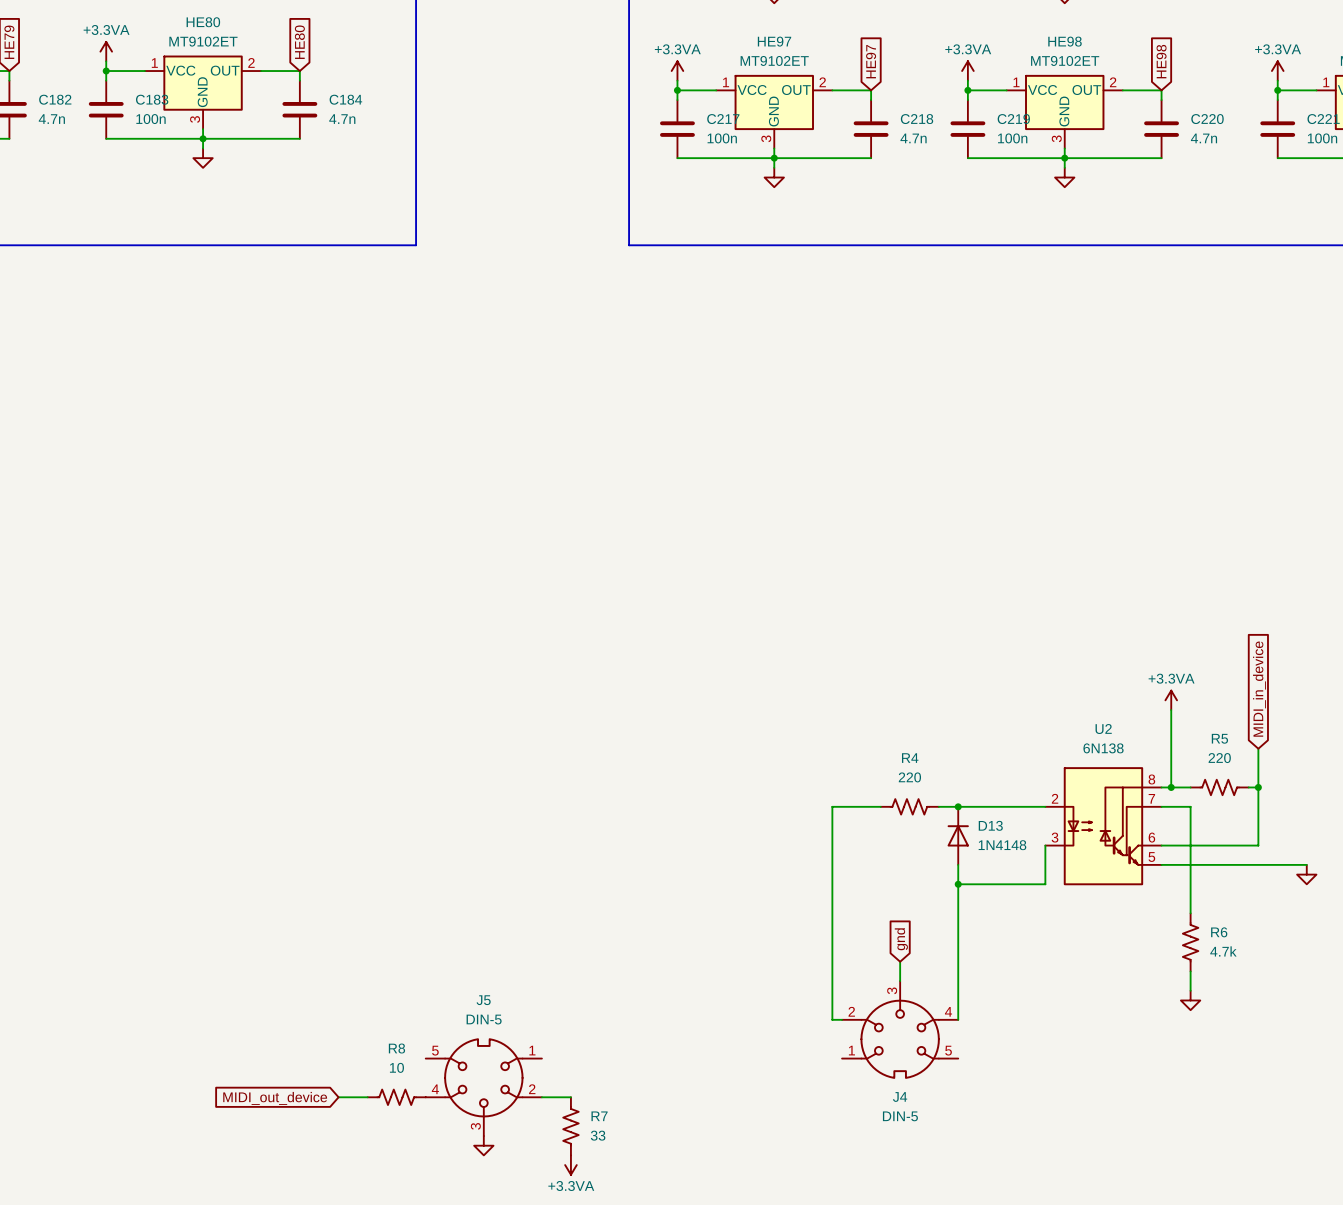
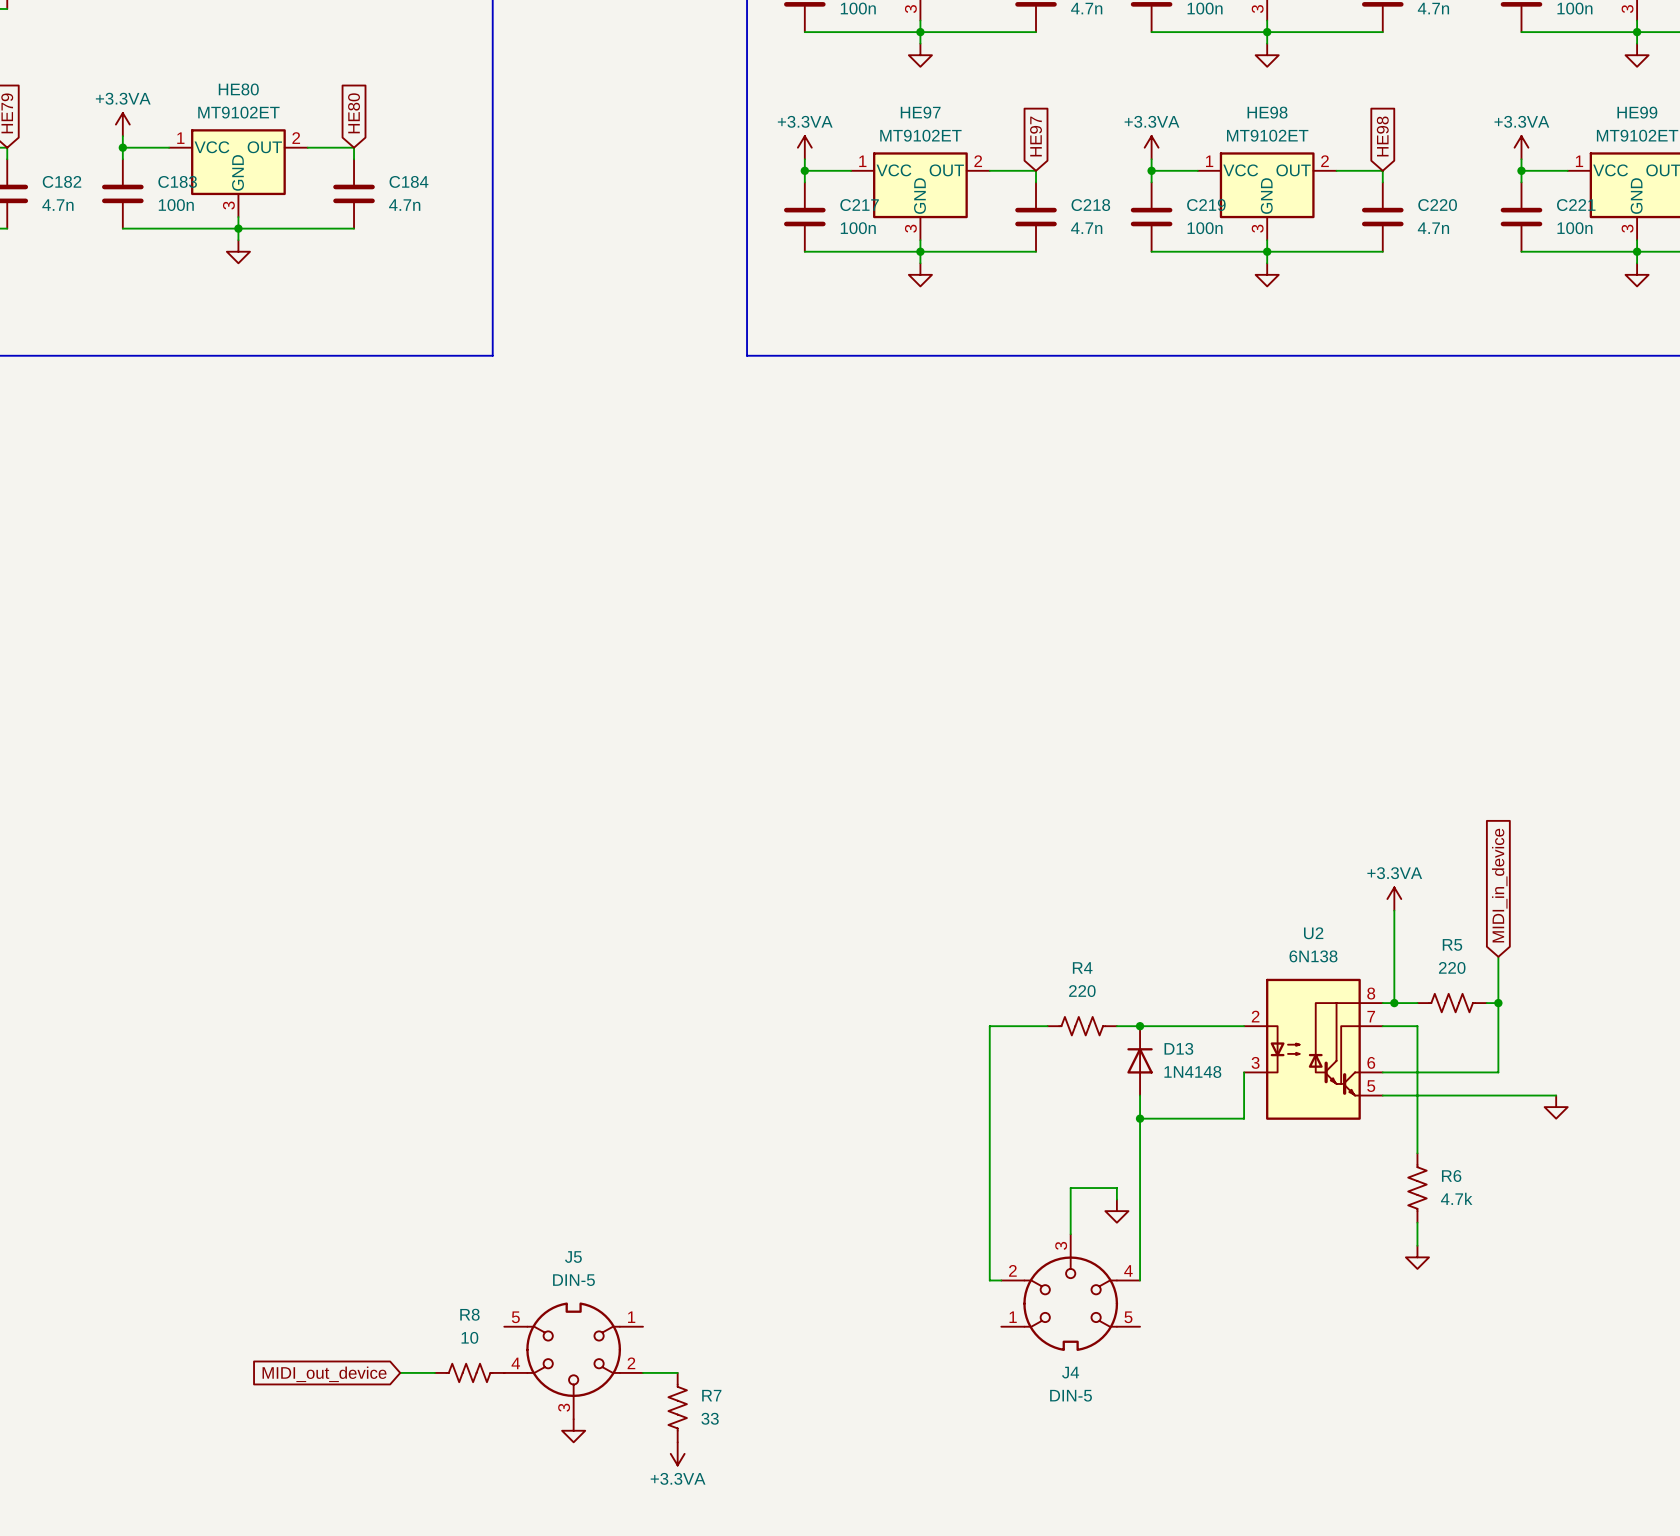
global label: gnd (901, 939) -> none
wire: none -> (1116, 1199) (1116, 1188) (1070, 1188) (1070, 1211)
power symbol: none -> (1116, 1211)

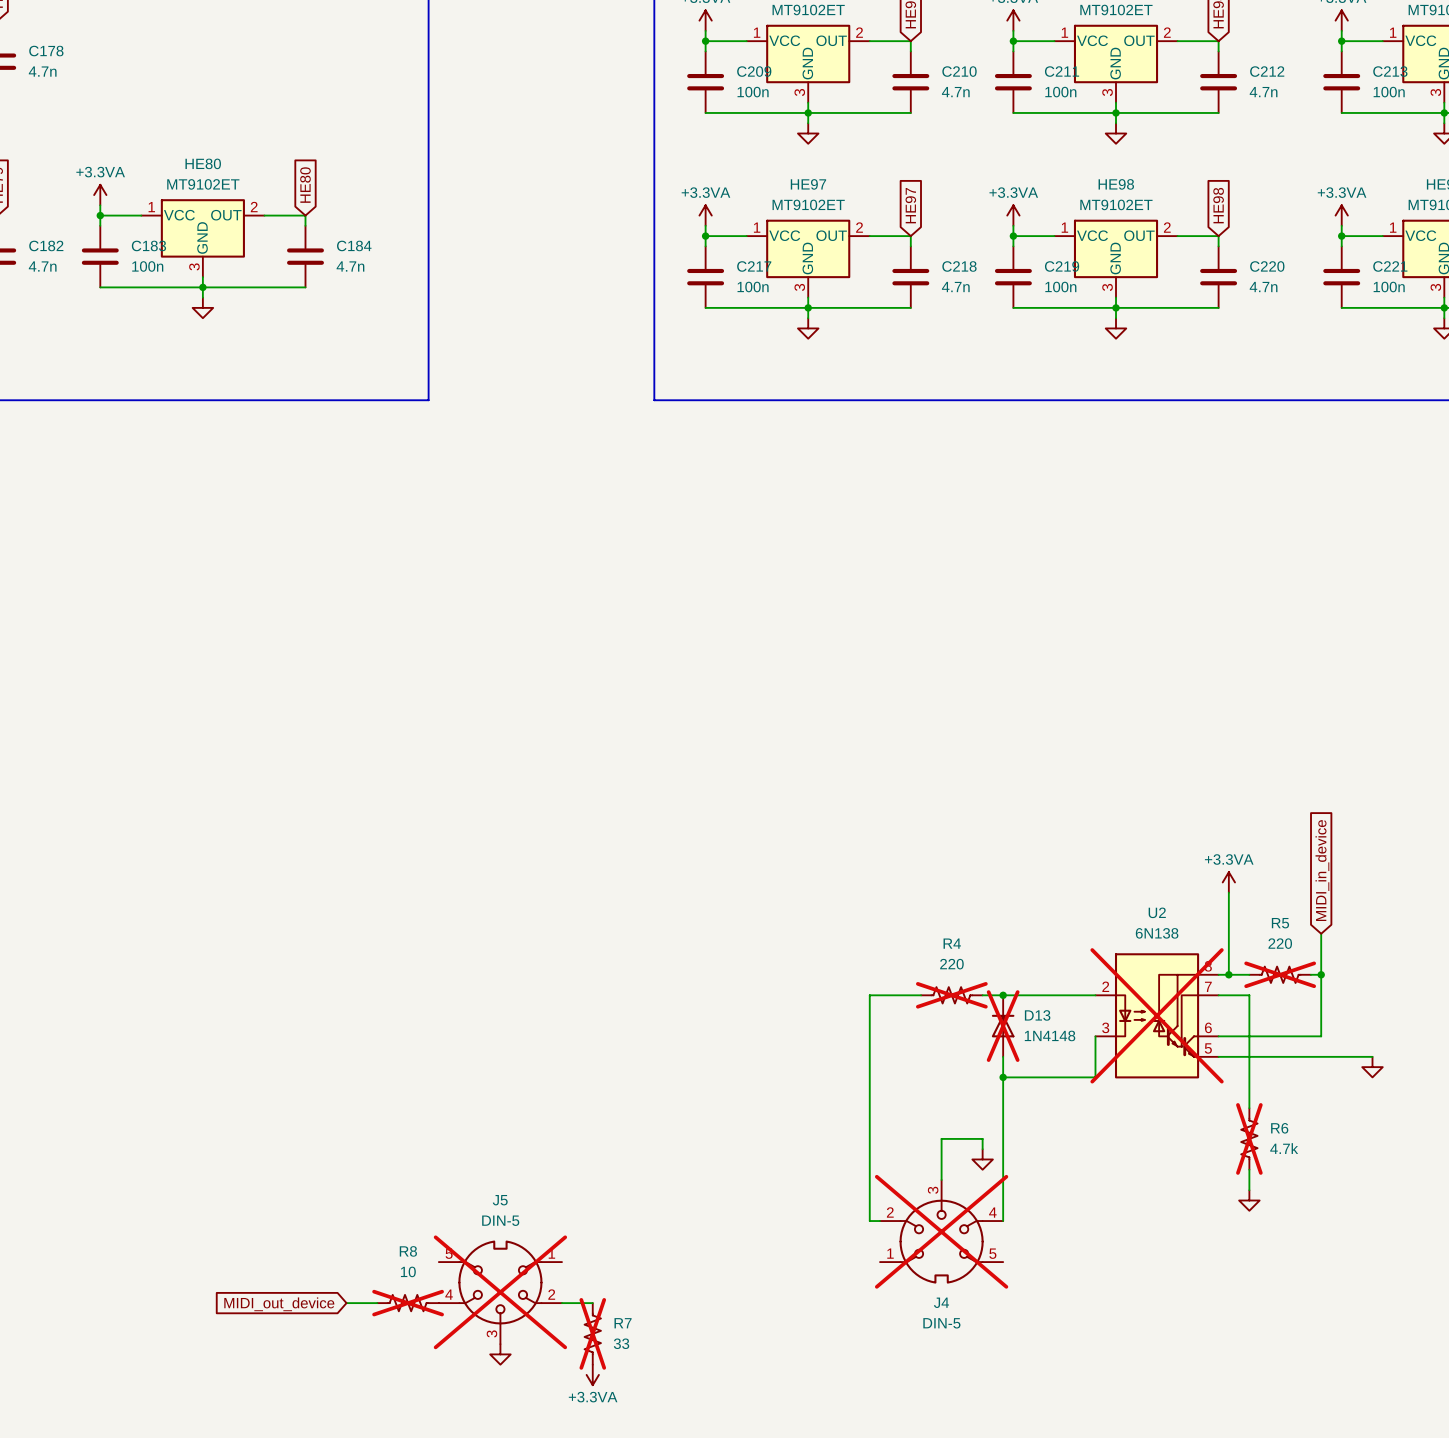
R5 do-not-place cross: none -> (1280, 974)
R4 do-not-place cross: none -> (951, 995)
U2 do-not-place cross: none -> (1157, 1015)
D13 do-not-place cross: none -> (1003, 1026)
R6 do-not-place cross: none -> (1249, 1138)
J4 do-not-place cross: none -> (941, 1231)
J5 do-not-place cross: none -> (500, 1292)
R8 do-not-place cross: none -> (408, 1303)
R7 do-not-place cross: none -> (592, 1333)

